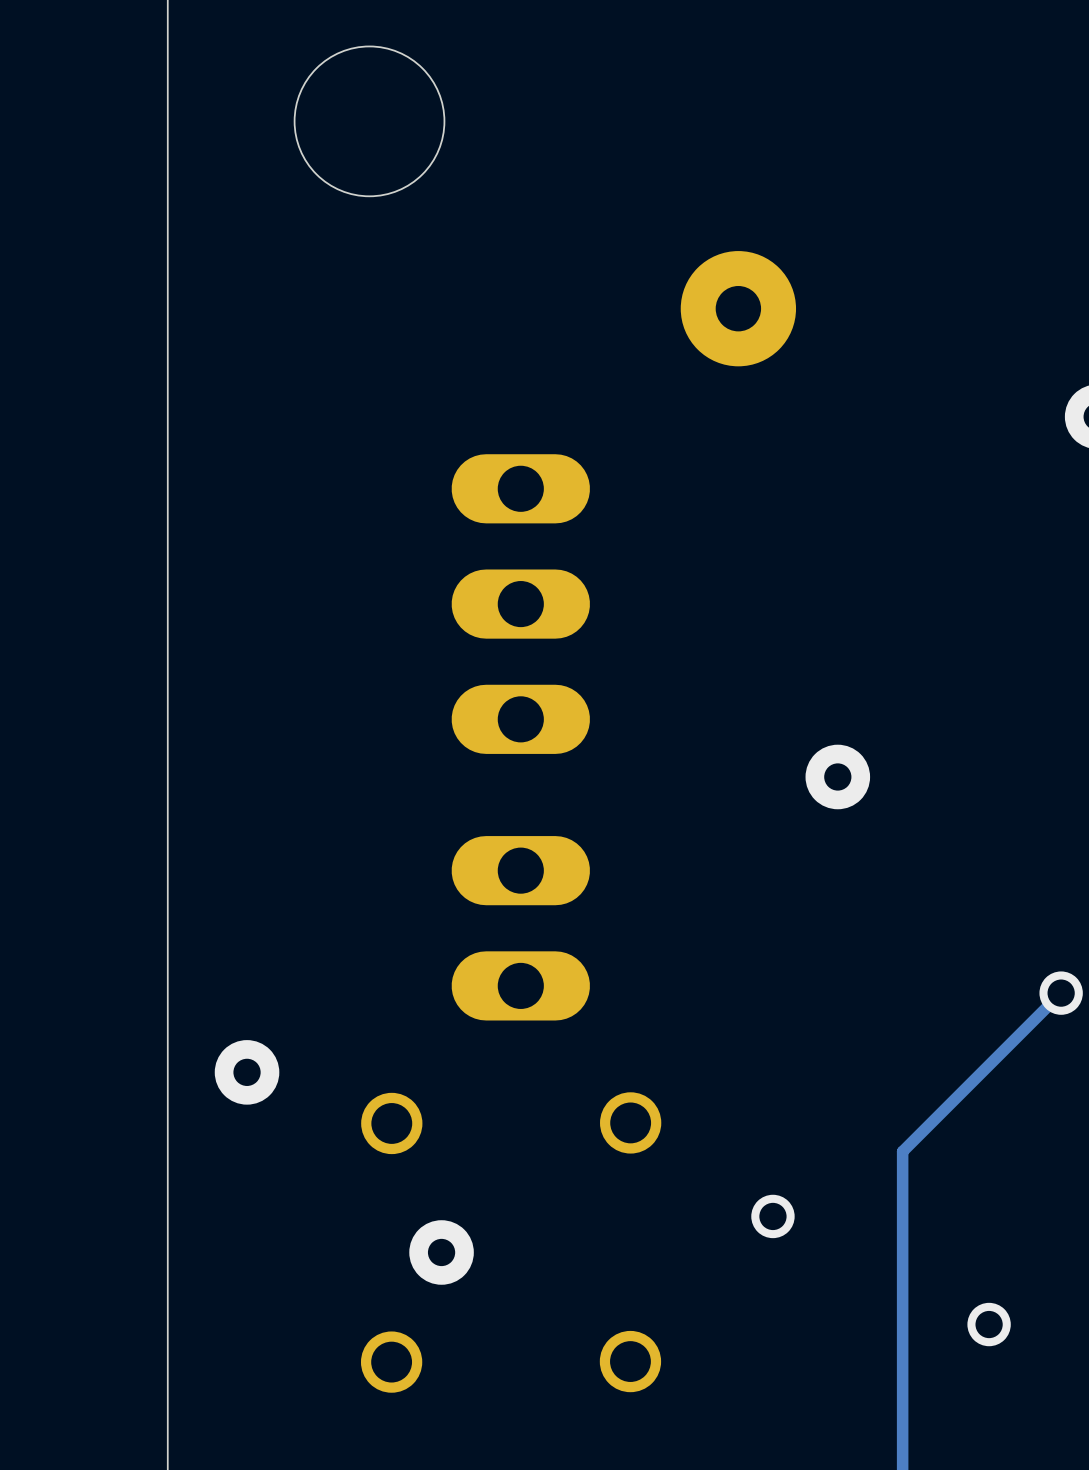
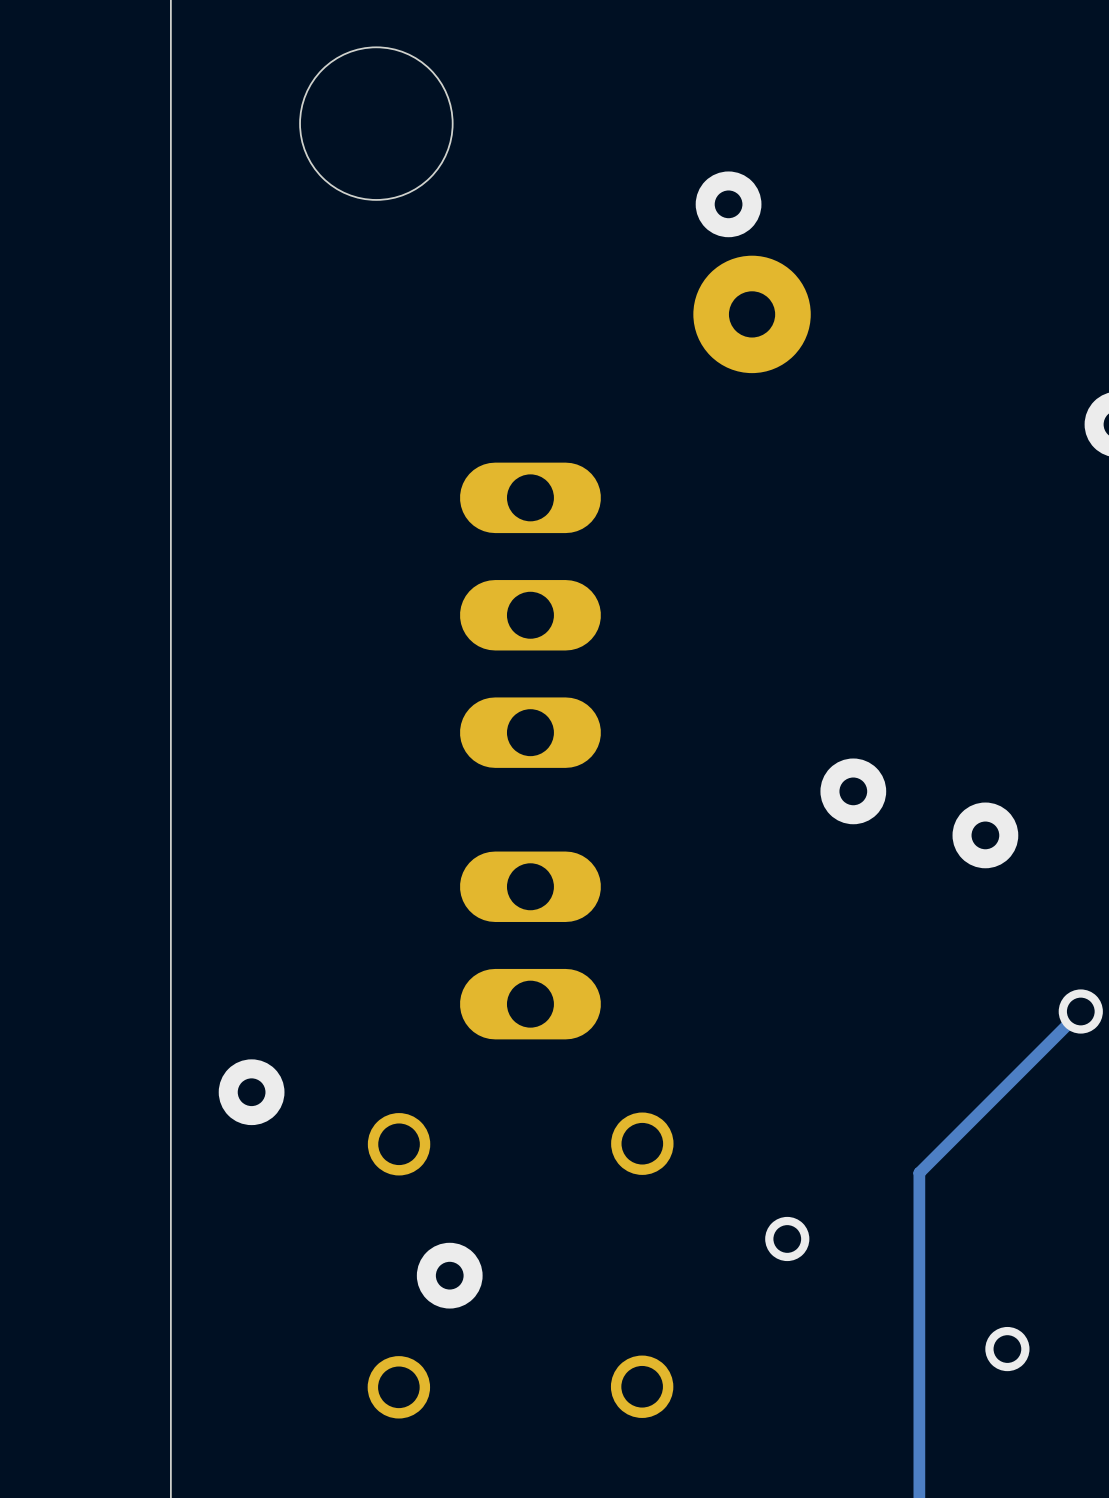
via: none -> (728, 204)
via: none -> (985, 835)

